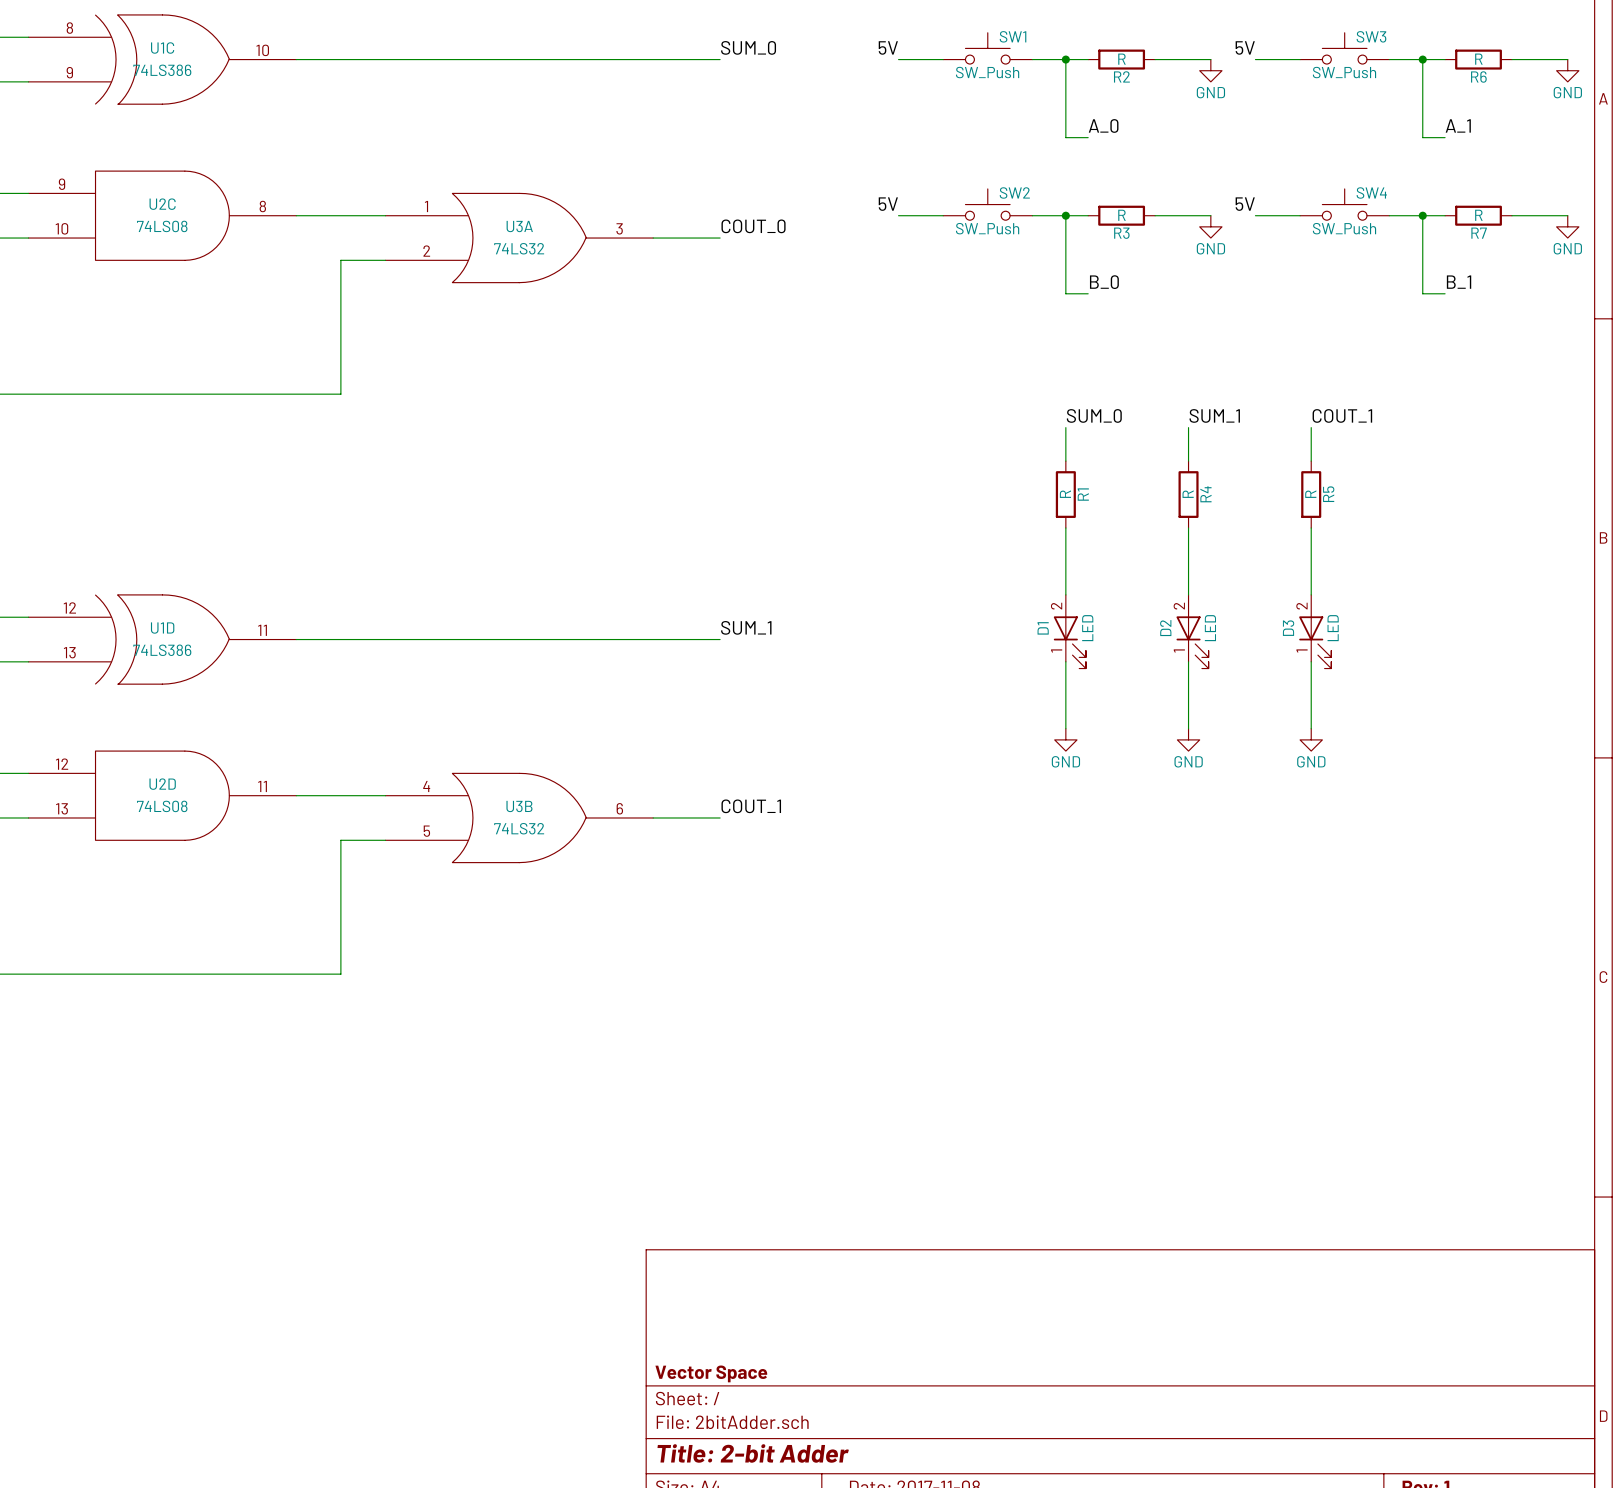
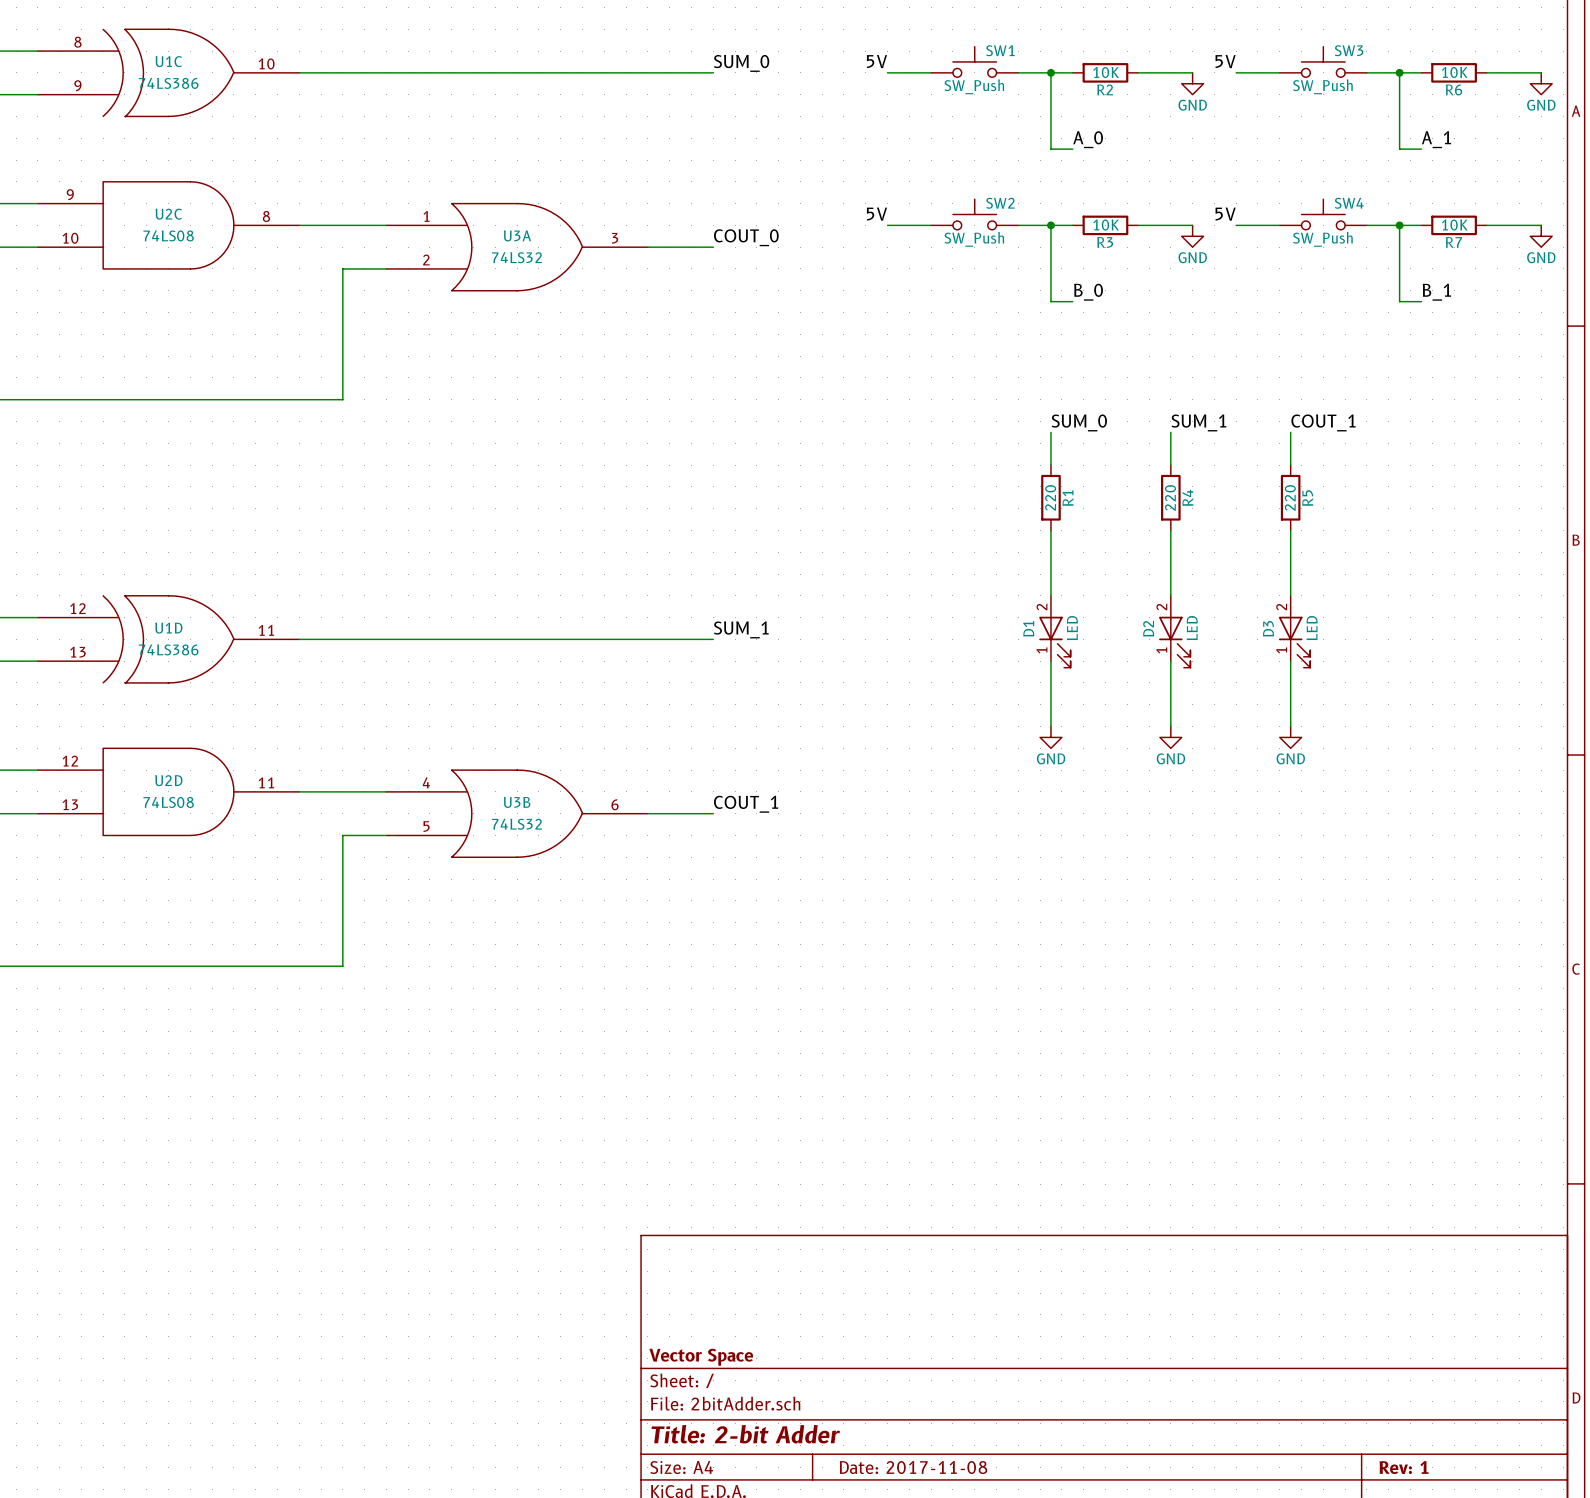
R2 value: R (1121, 59) -> 10K (1106, 72)
R6 value: R (1478, 59) -> 10K (1454, 72)
R3 value: R (1121, 215) -> 10K (1106, 225)
R7 value: R (1478, 215) -> 10K (1454, 225)
R1 value: R (1065, 494) -> 220 (1050, 497)
R4 value: R (1188, 494) -> 220 (1170, 497)
R5 value: R (1310, 494) -> 220 (1290, 497)

